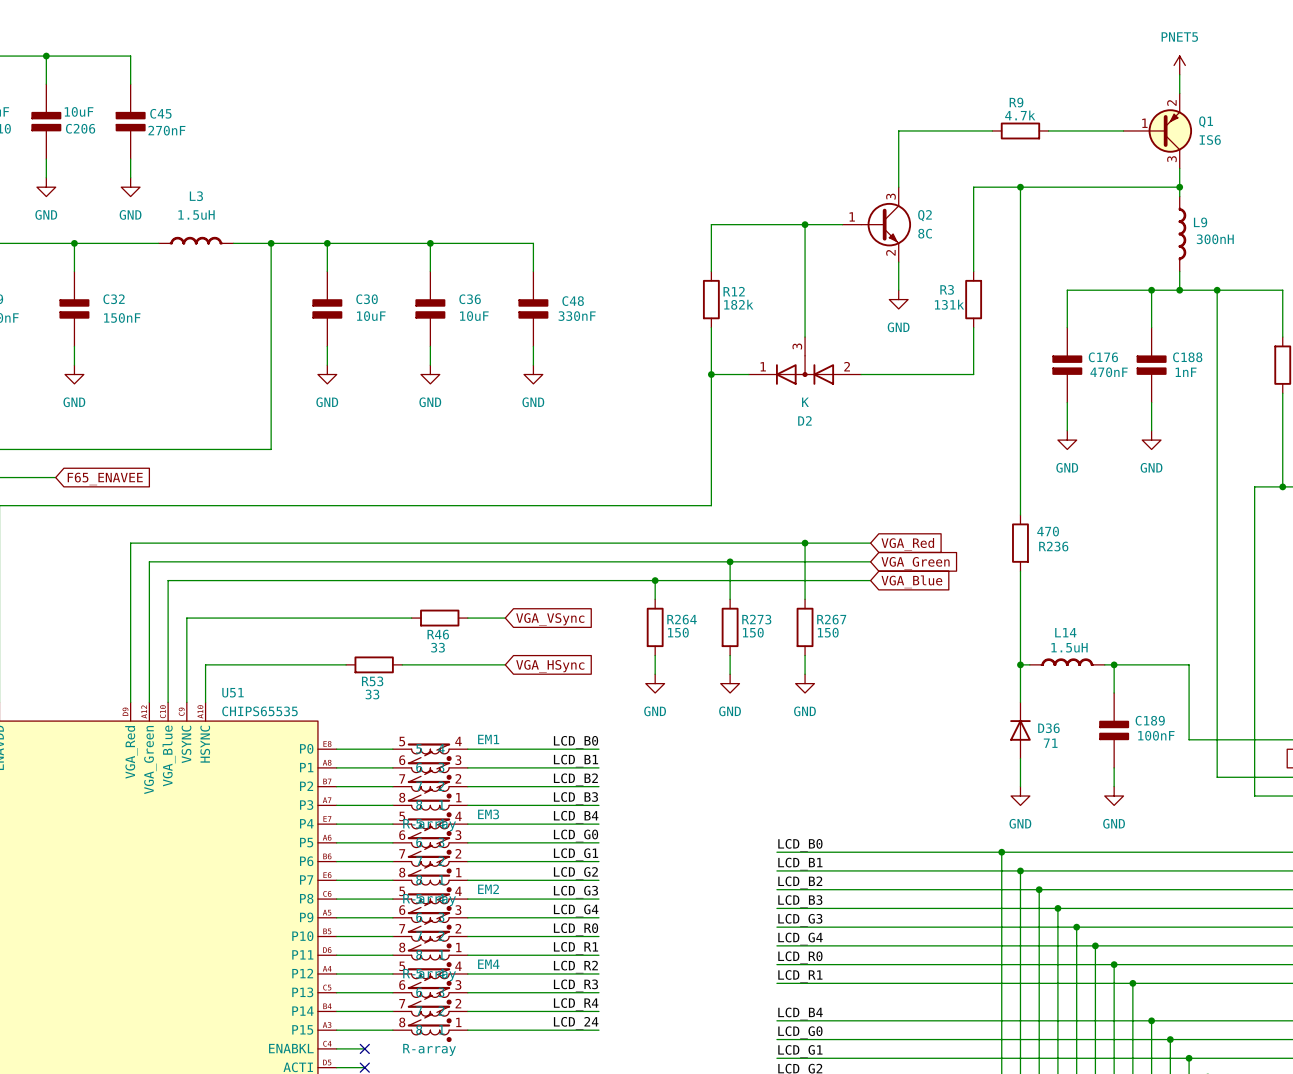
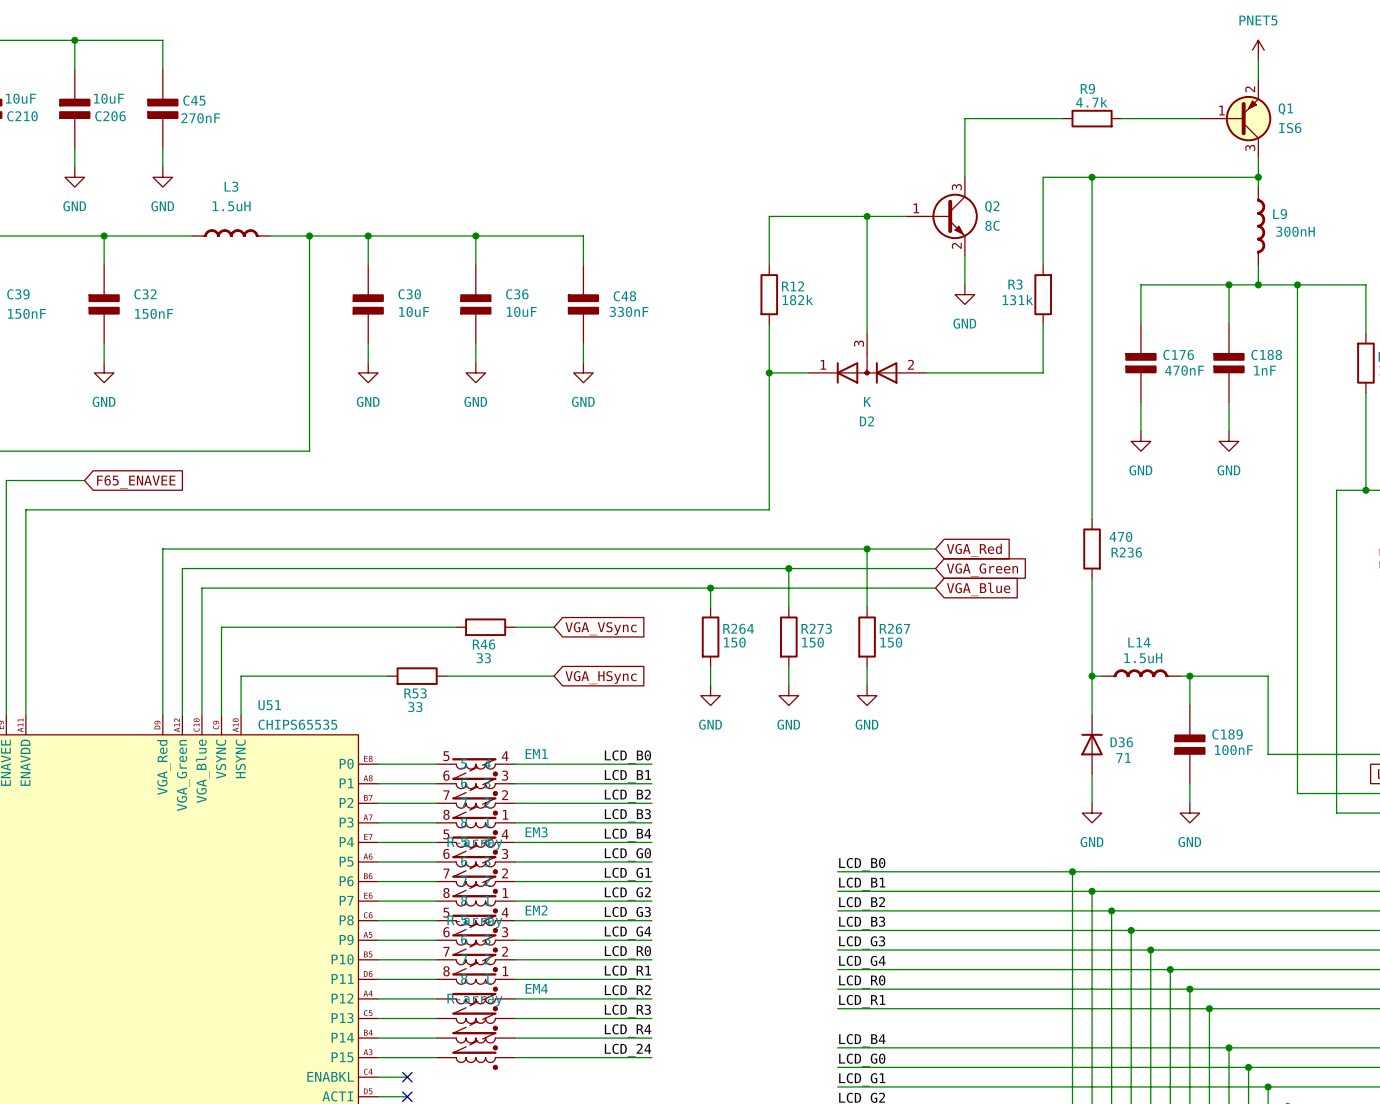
EM4 symbol: [392, 968, 468, 1042] -> [436, 992, 515, 1070]
EM4 value: R-array (429, 1049) -> none

